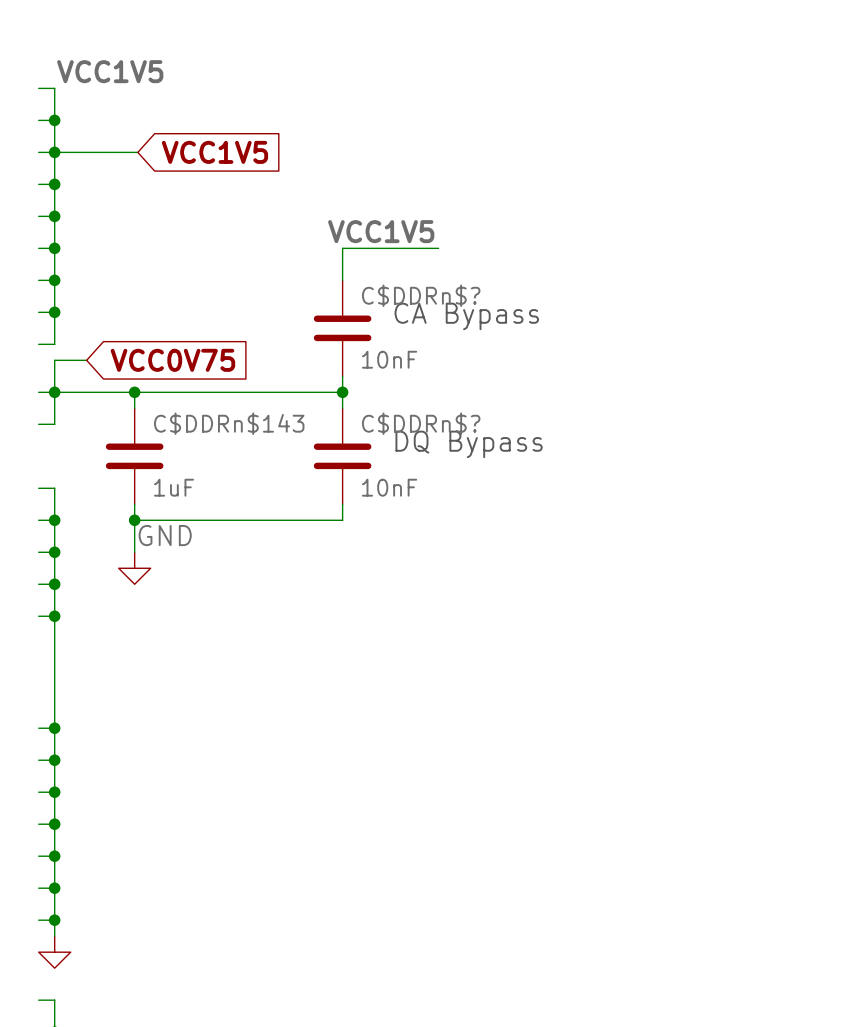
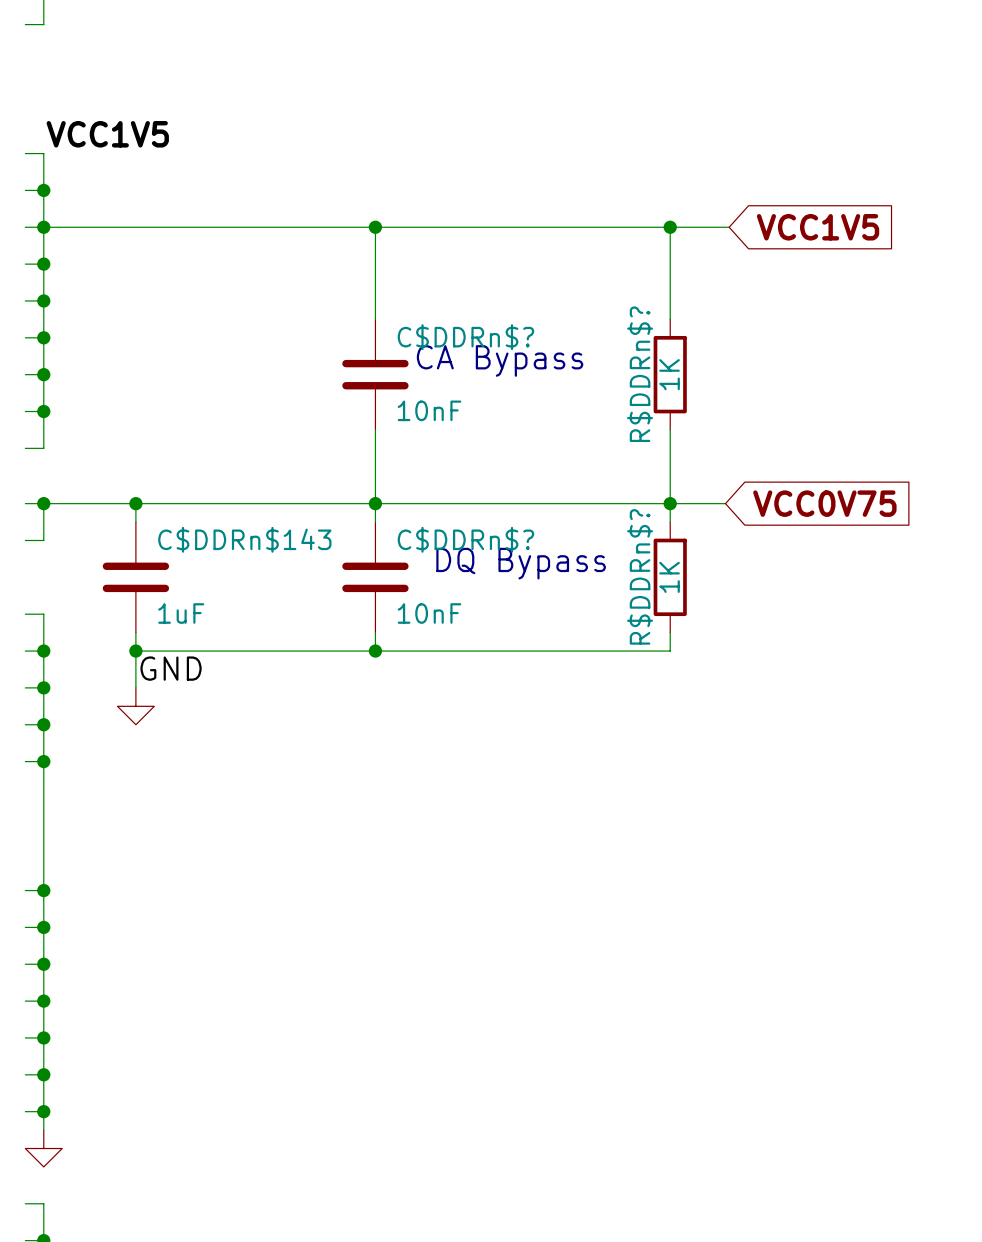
wire: none -> (139, 227) (729, 227)
global label: VCC1V5 (214, 152) -> none
wire: none -> (375, 227) (375, 319)
junction: none -> (375, 227)
wire: none -> (670, 227) (670, 319)
junction: none -> (670, 227)
global label: none -> VCC1V5 (818, 227)
label: VCC1V5 (381, 231) -> none
wire: (438, 248) (342, 248) (342, 280) -> none
R$DDRn$?: none -> 1K (670, 374)
text position: CA Bypass (466, 316) -> CA Bypass (500, 360)
C$DDRn$? position: (342, 328) -> (375, 374)
wire: none -> (670, 429) (670, 522)
wire: (86, 360) (54, 360) (54, 392) -> none
global label: VCC0V75 (172, 360) -> none
wire: none -> (375, 503) (725, 503)
junction: none -> (670, 503)
global label: none -> VCC0V75 (824, 503)
R$DDRn$?: none -> 1K (670, 577)
wire: none -> (670, 632) (670, 651) (375, 651)
junction: none -> (375, 651)

